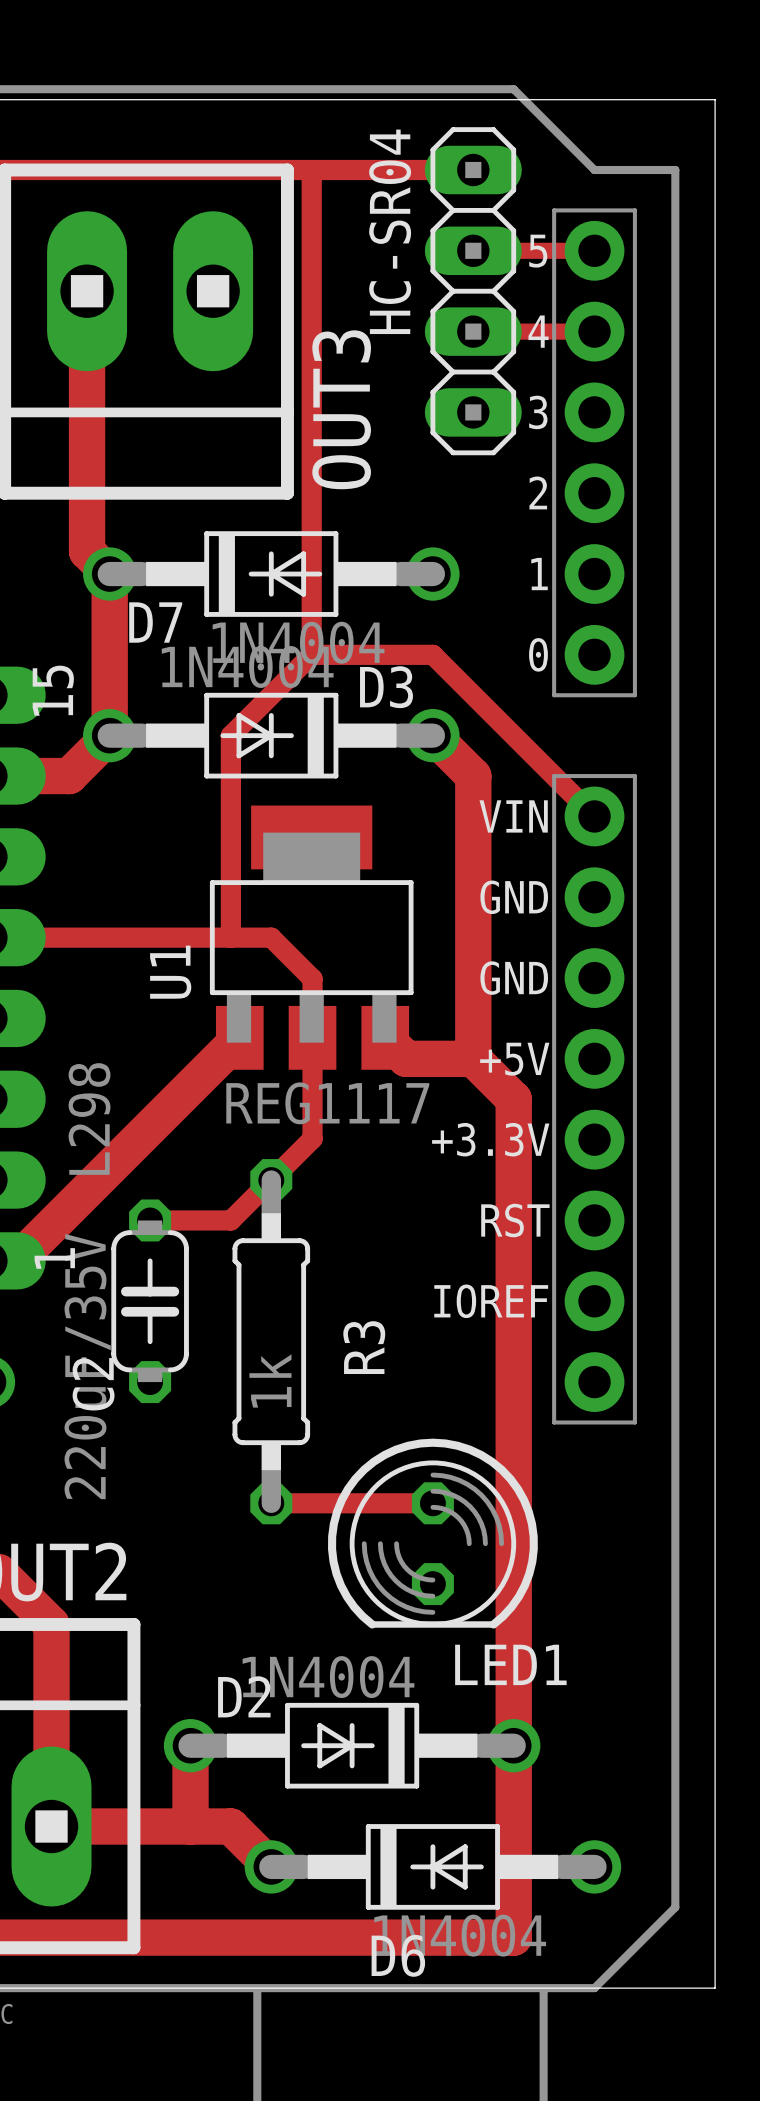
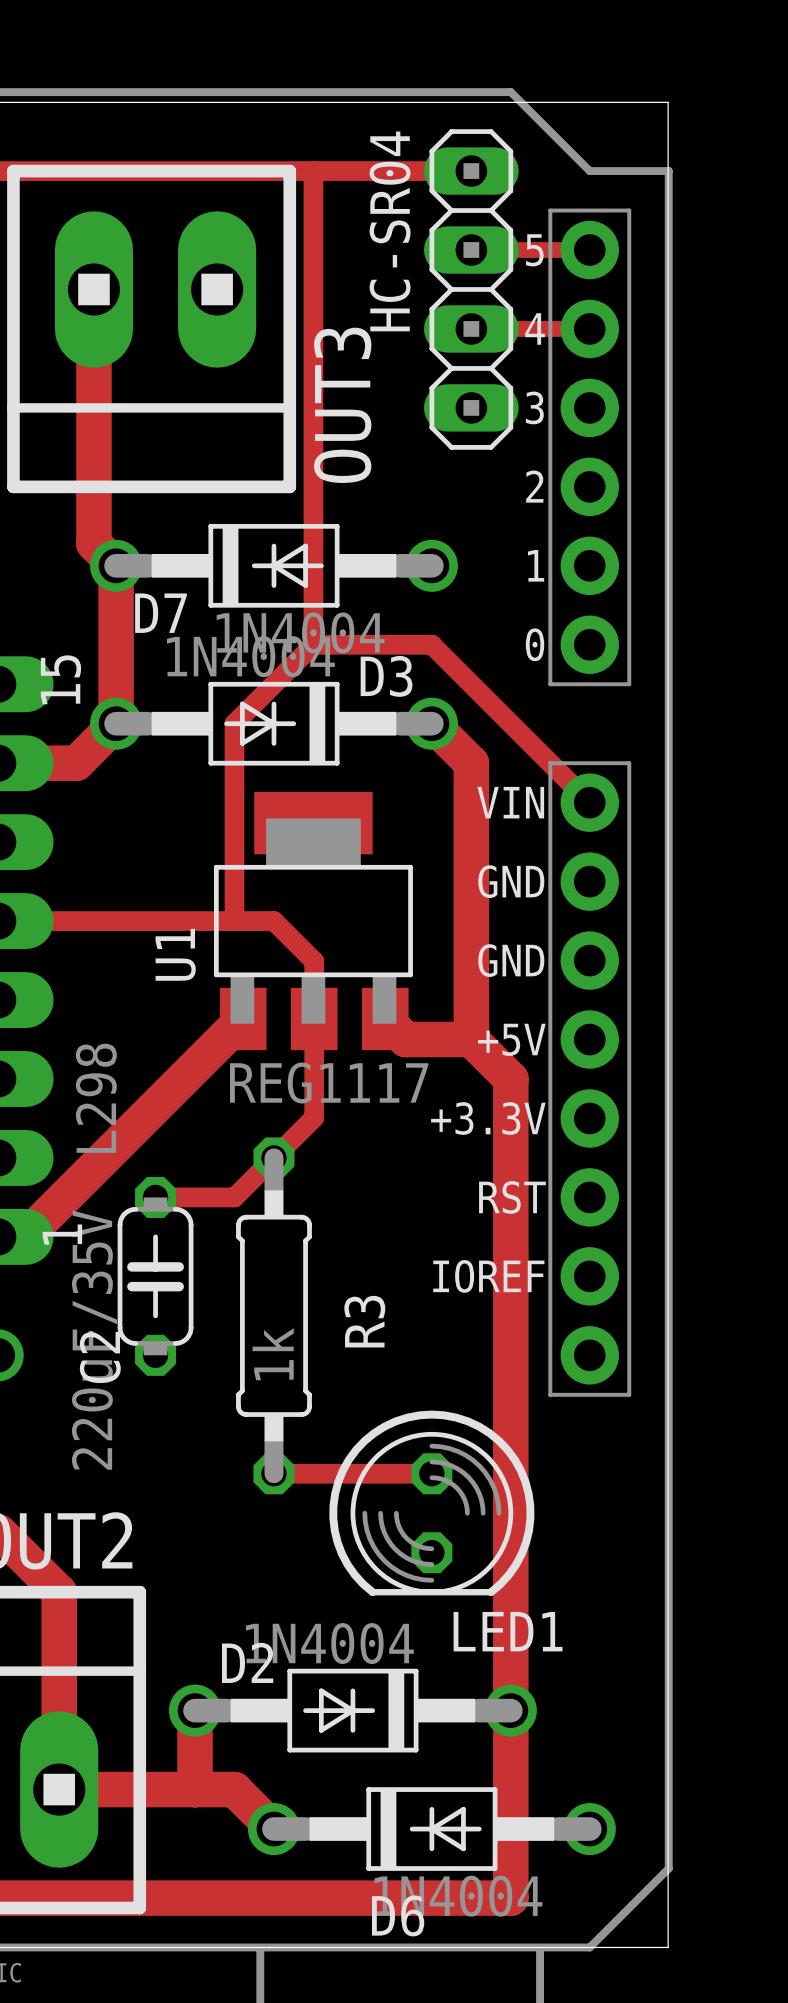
board edge: (674, 99) (715, 99) (715, 1988) (674, 1988) -> (668, 102) (668, 1947)

